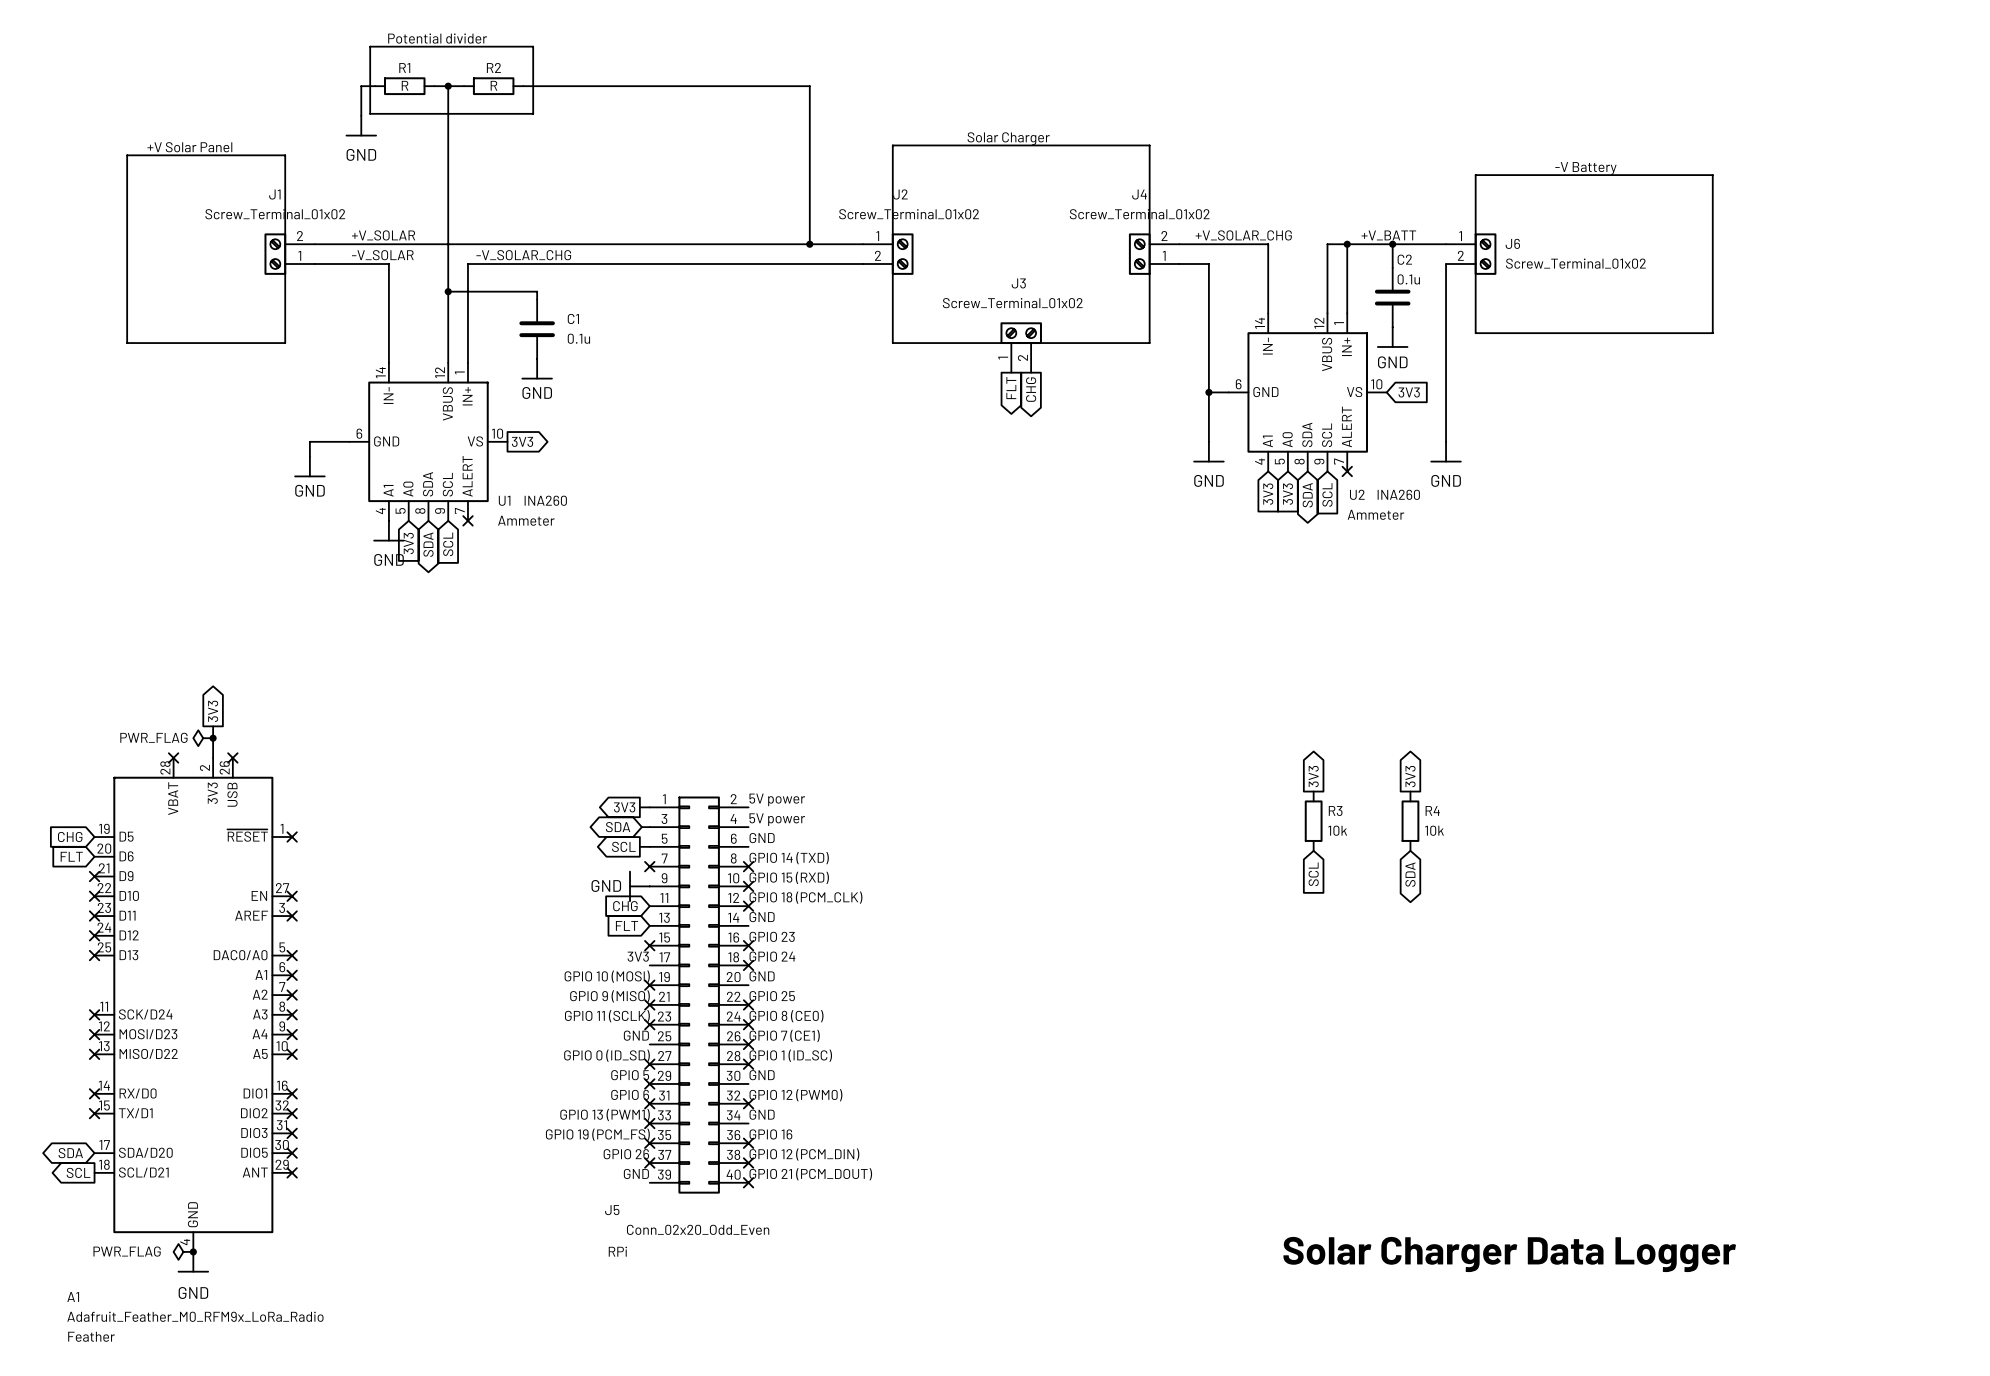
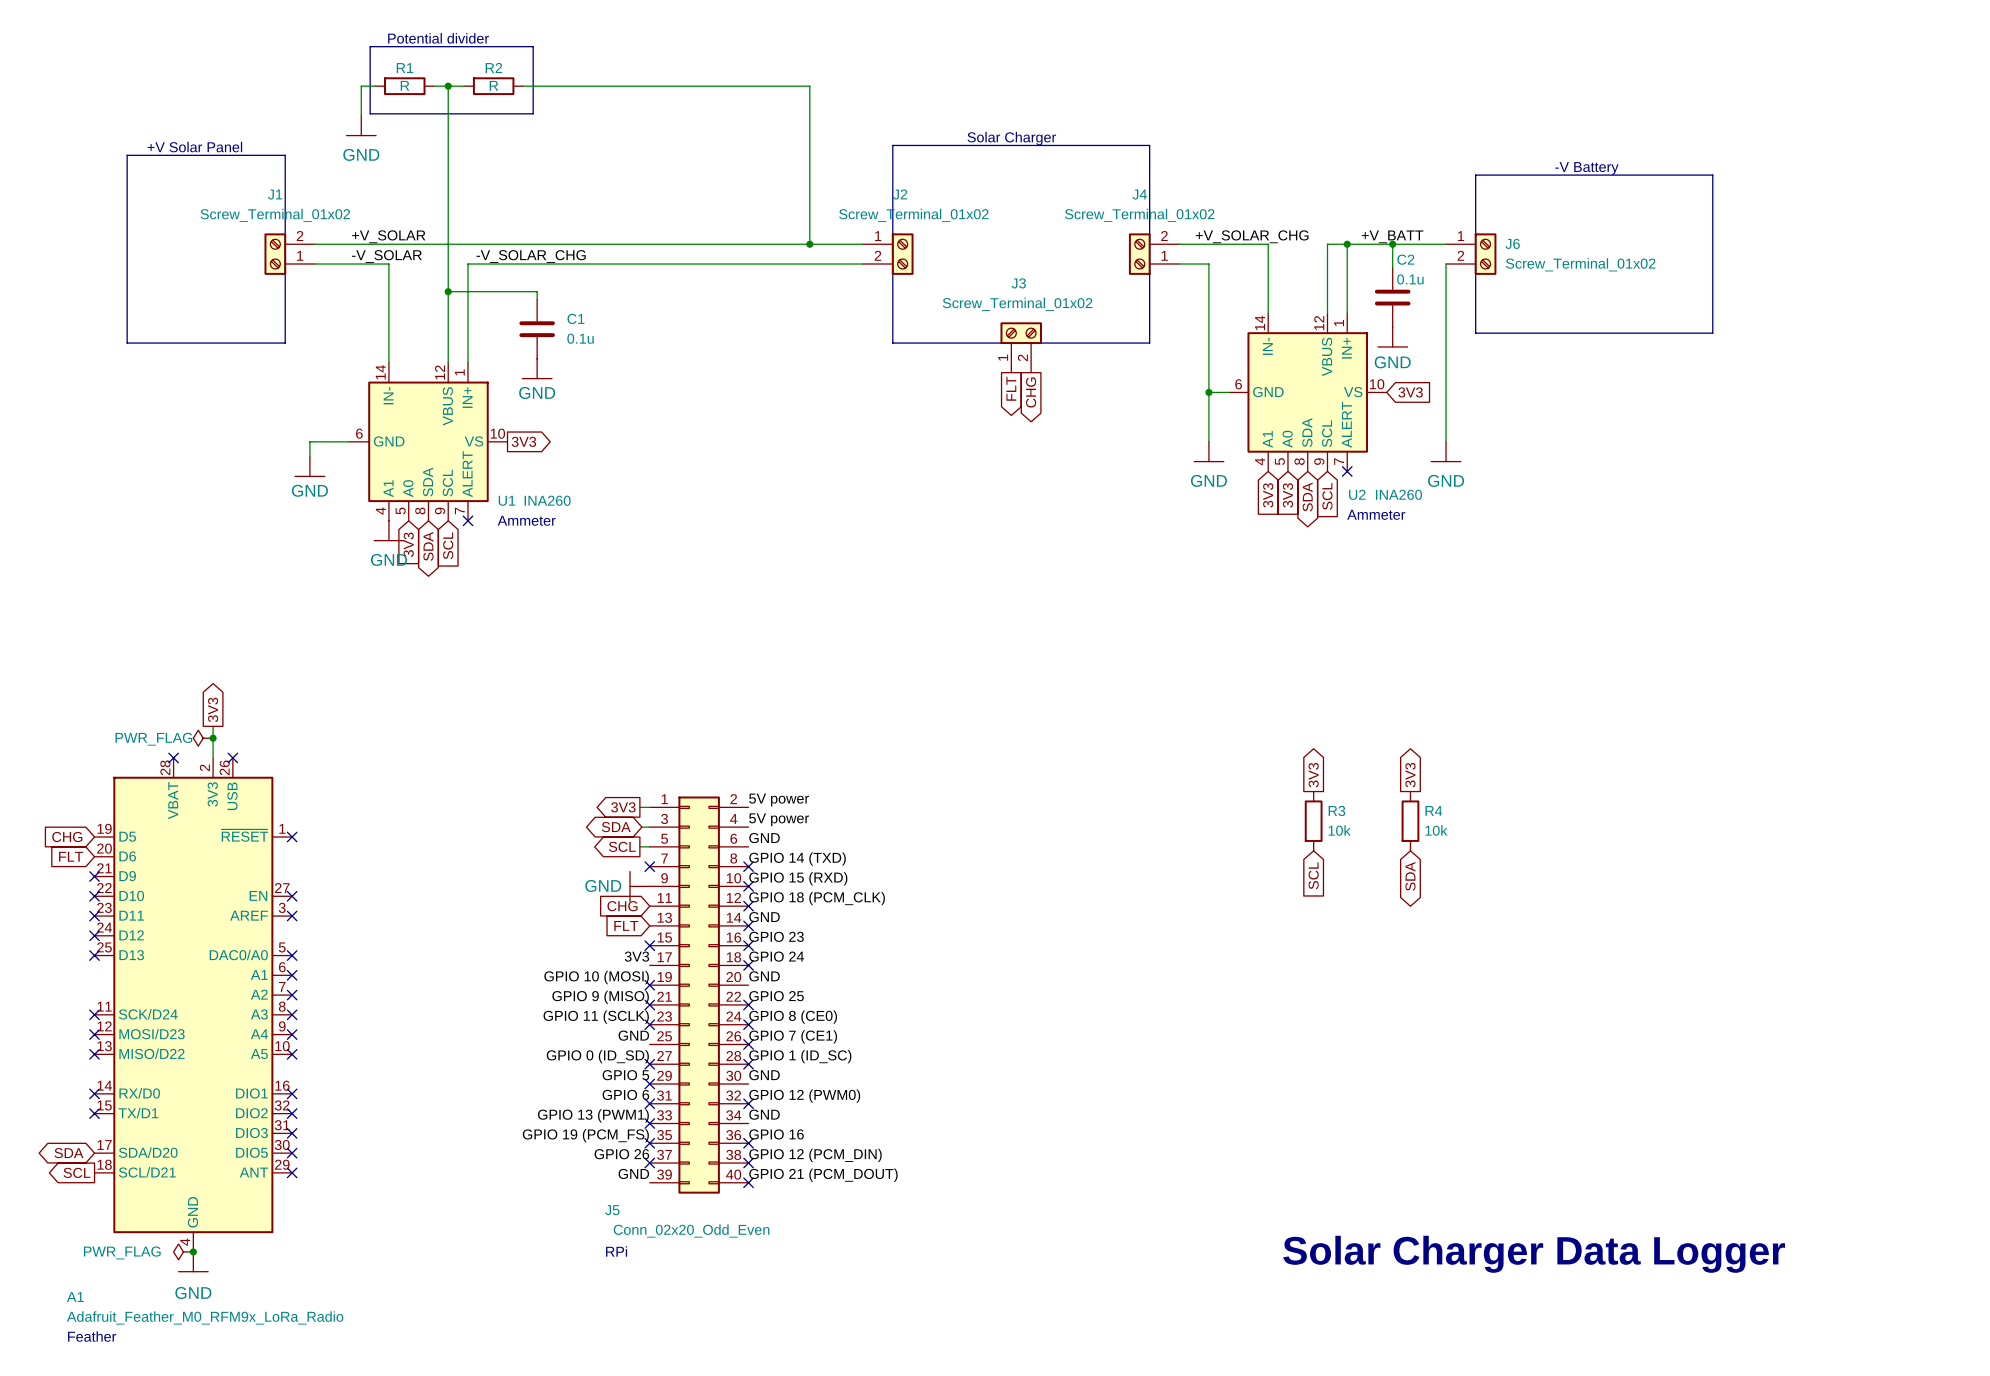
no-connect mark: none -> (748, 925)

